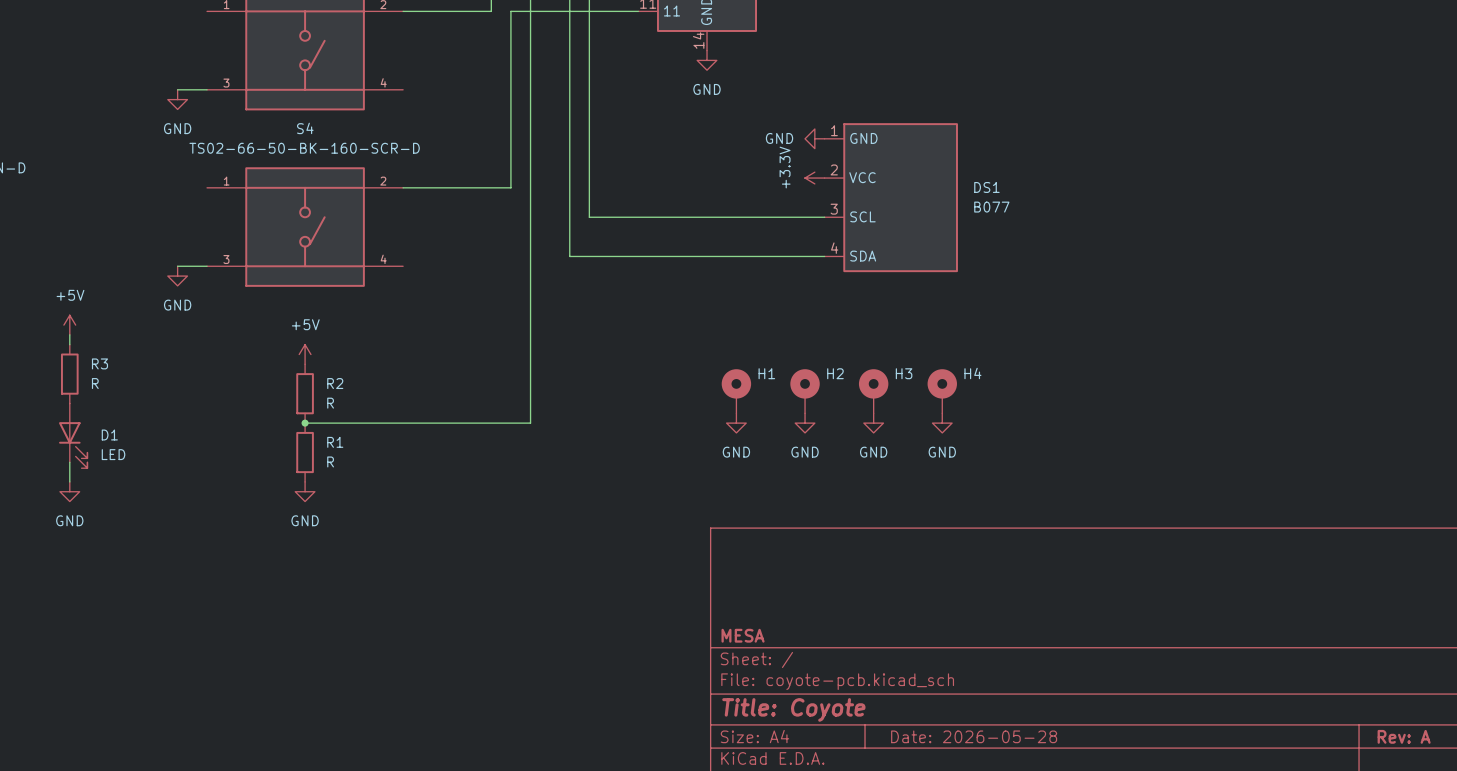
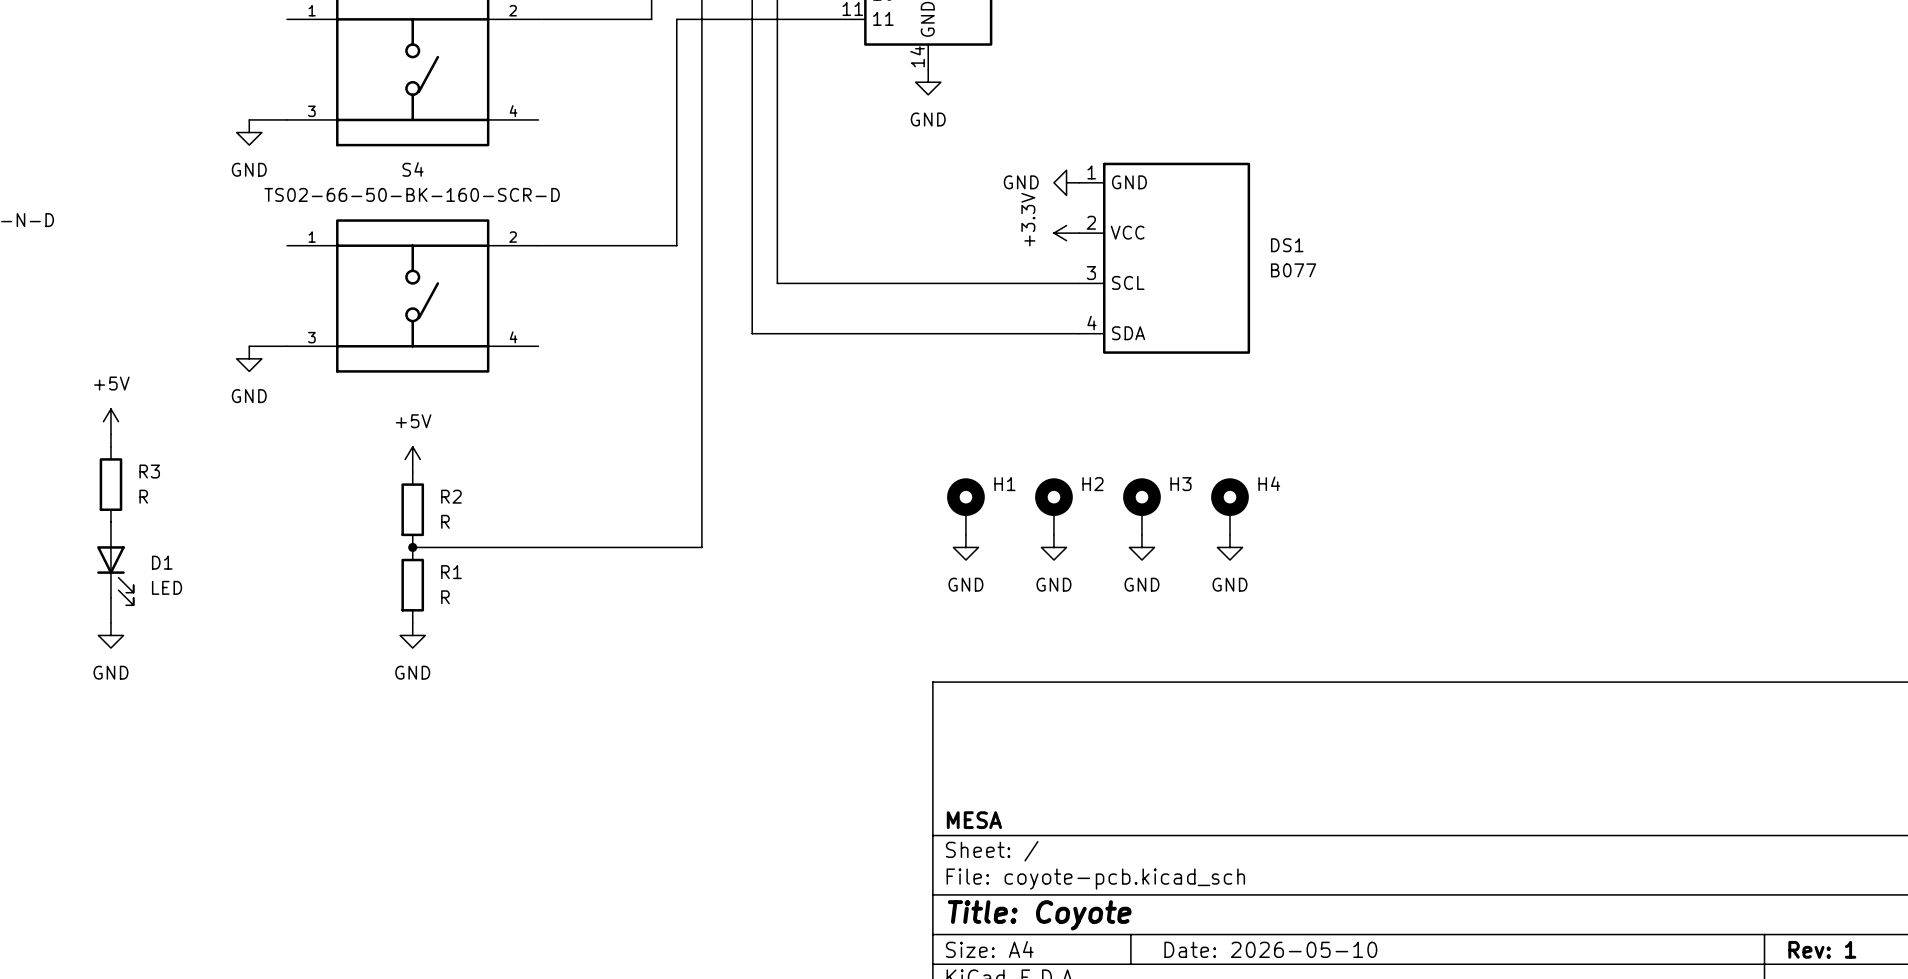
title block: Date: 2026-05-28 (974, 736) -> Date: 2026-05-10 (1270, 949)
title block: Rev: A (1404, 736) -> Rev: 1 (1822, 949)

